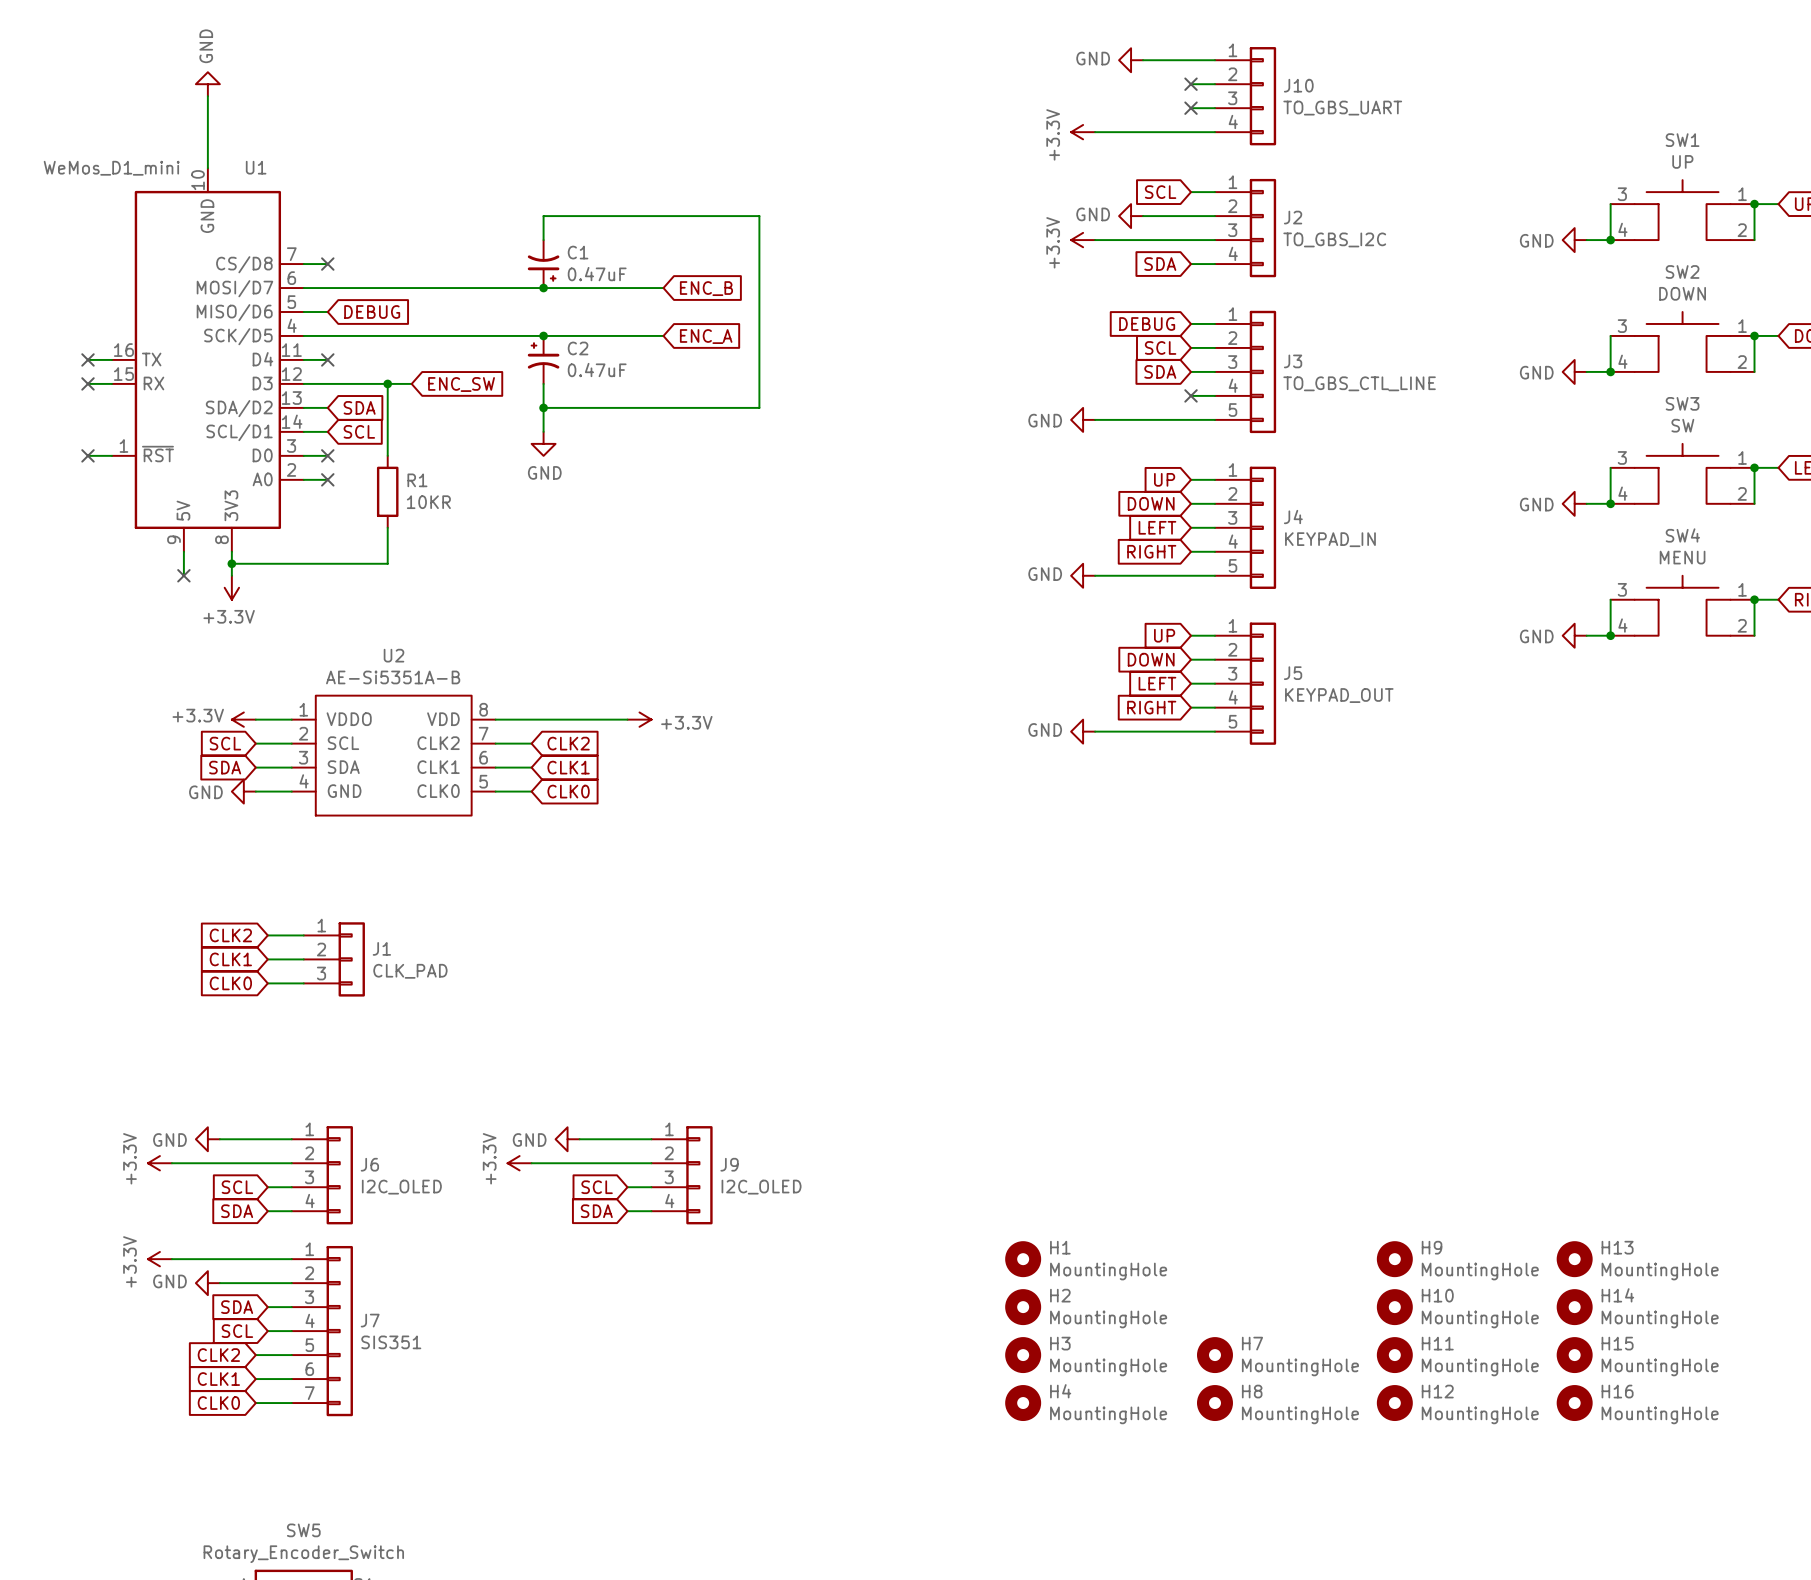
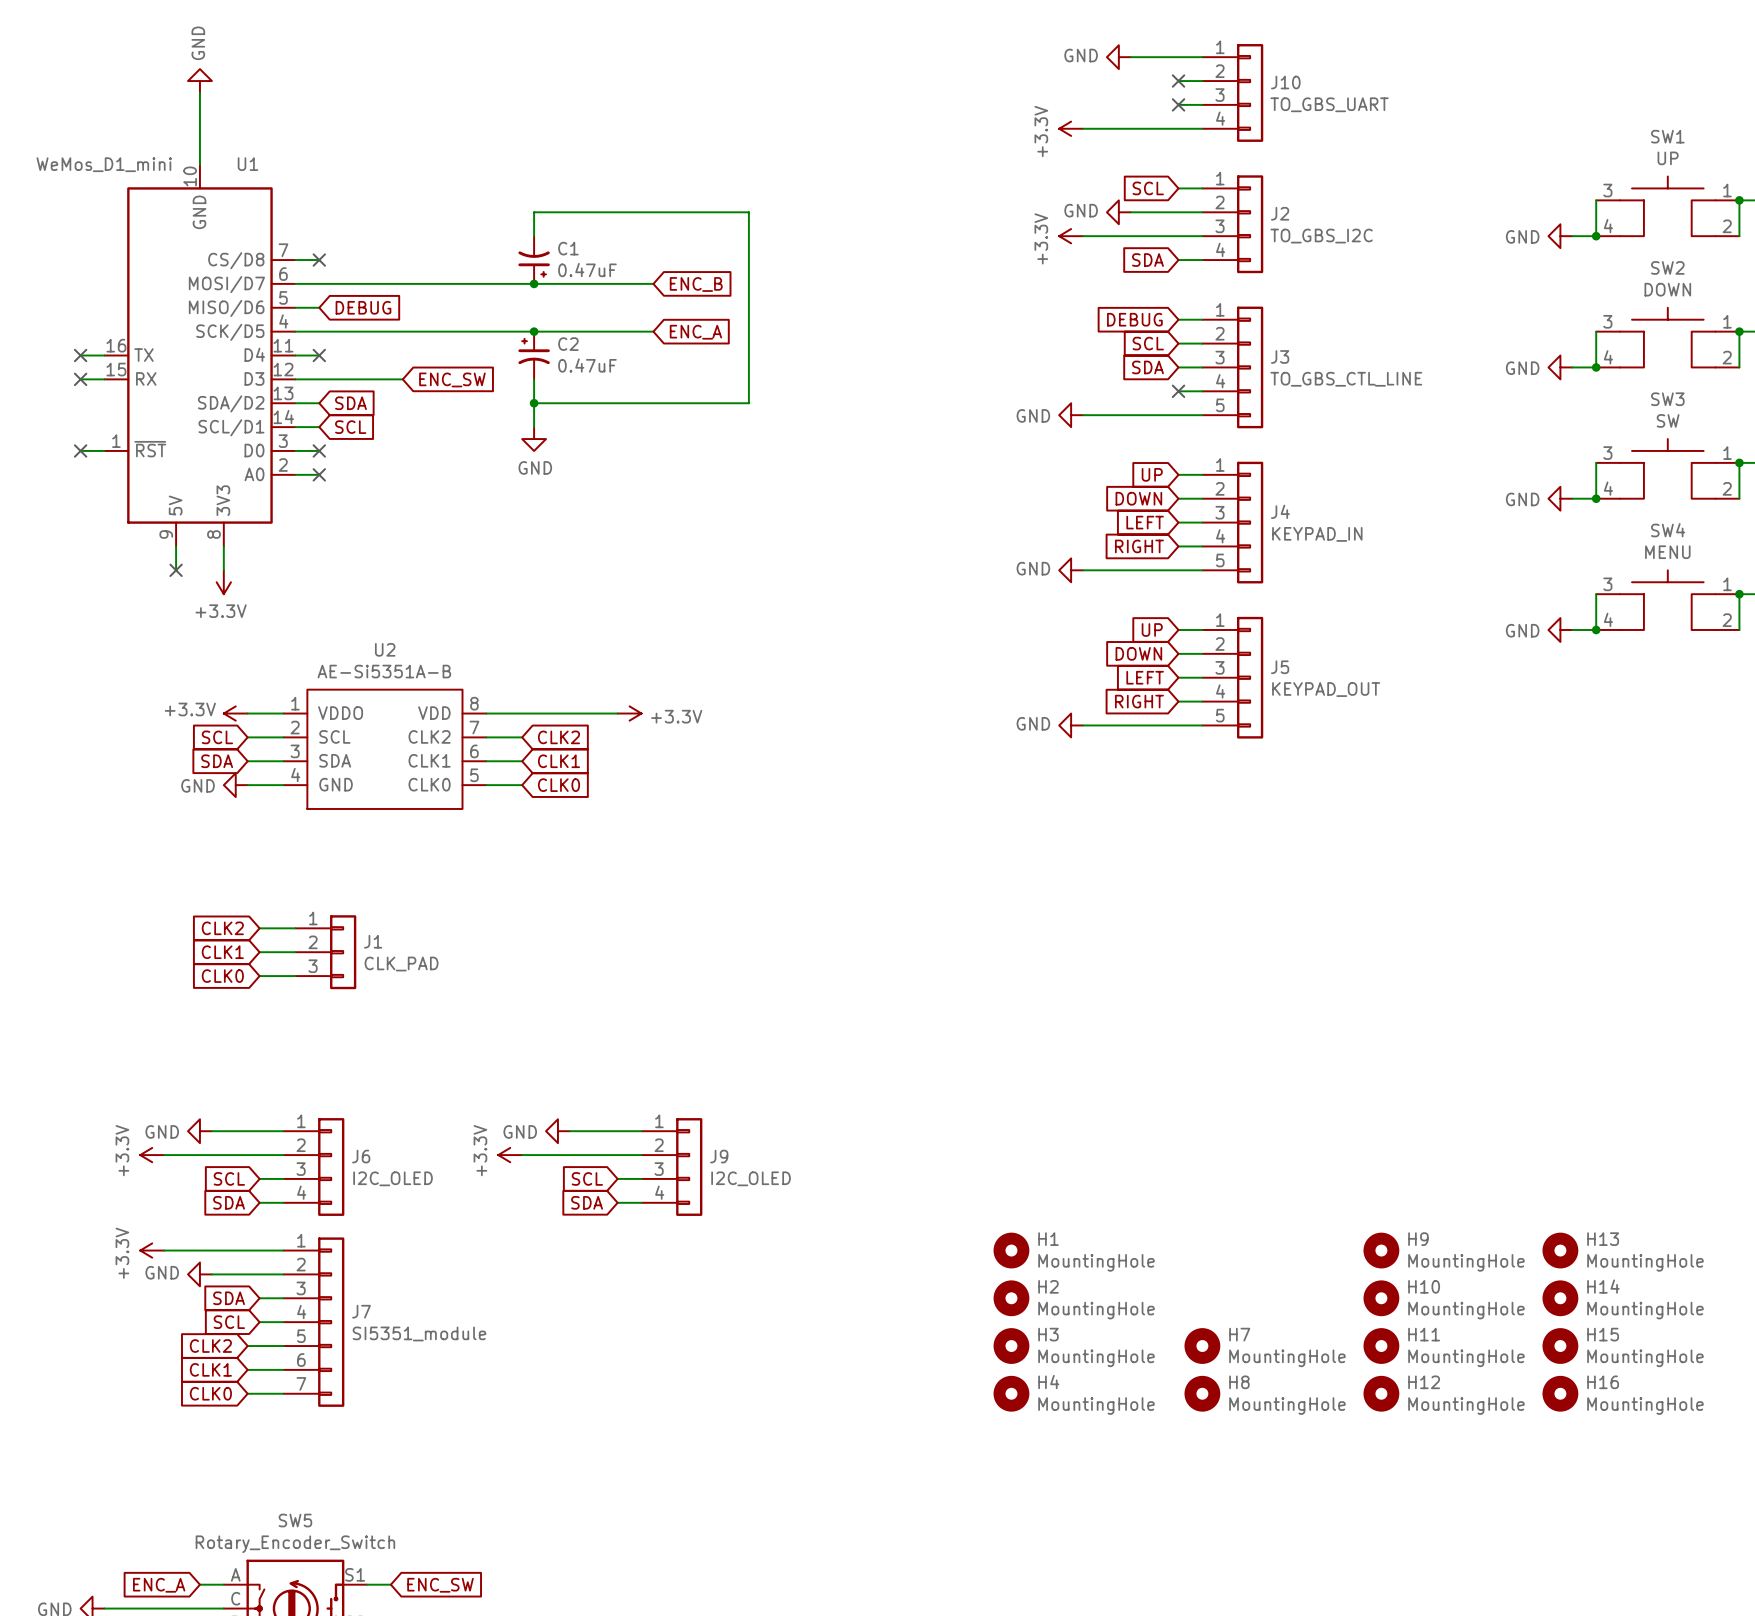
wire: (387, 383) (387, 455) -> none
junction: (387, 383) -> none
R1: 10KR (387, 491) -> none
wire: (387, 527) (387, 563) (231, 563) -> none
junction: (231, 563) -> none
J7 value: SIS351 (391, 1342) -> SI5351_module (419, 1333)

